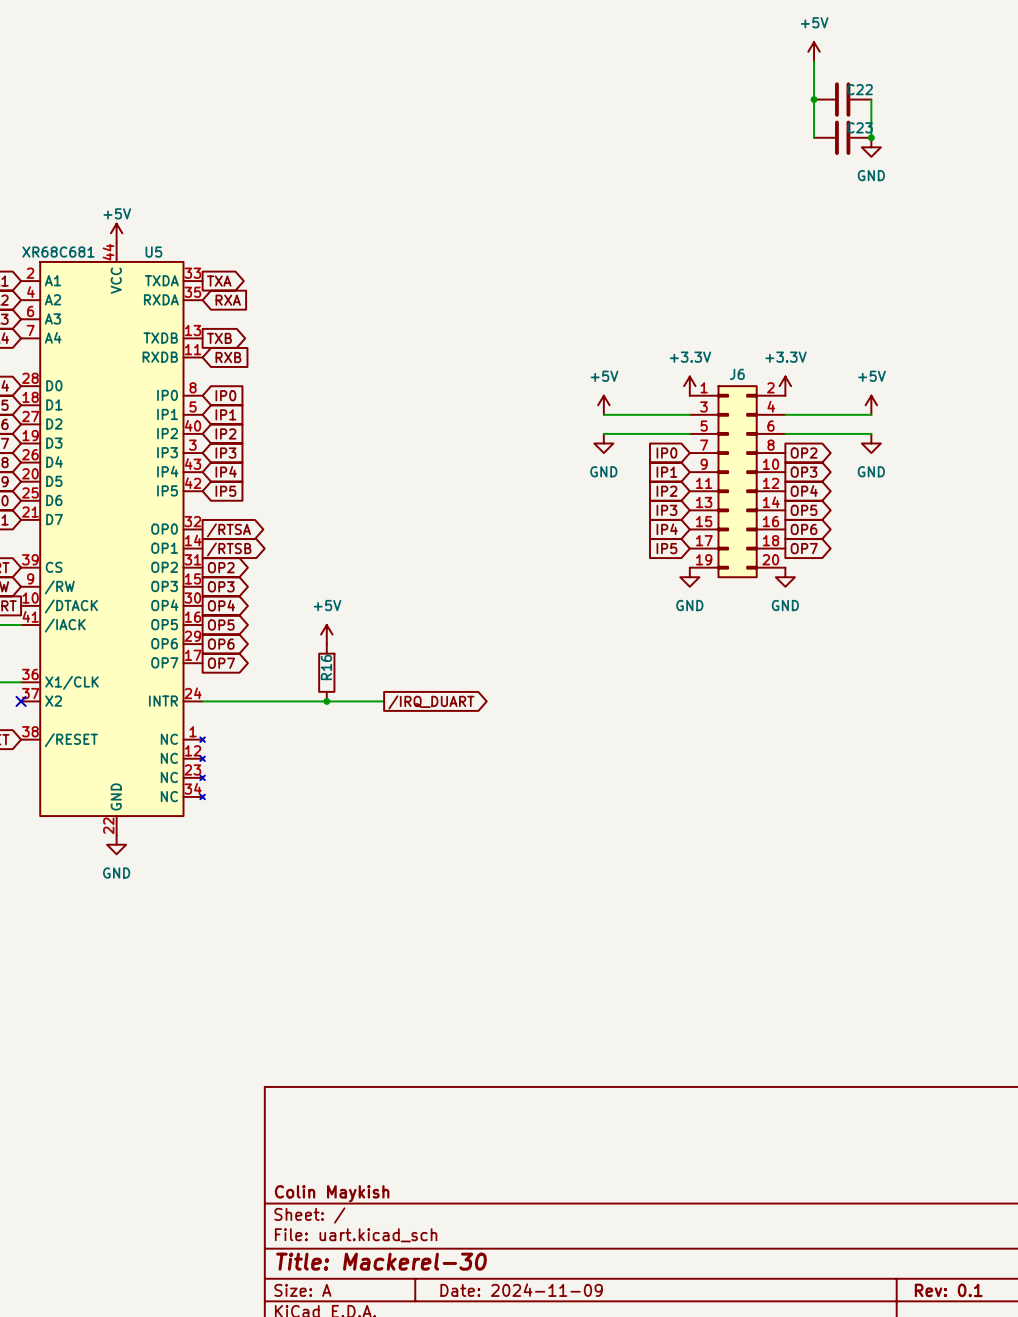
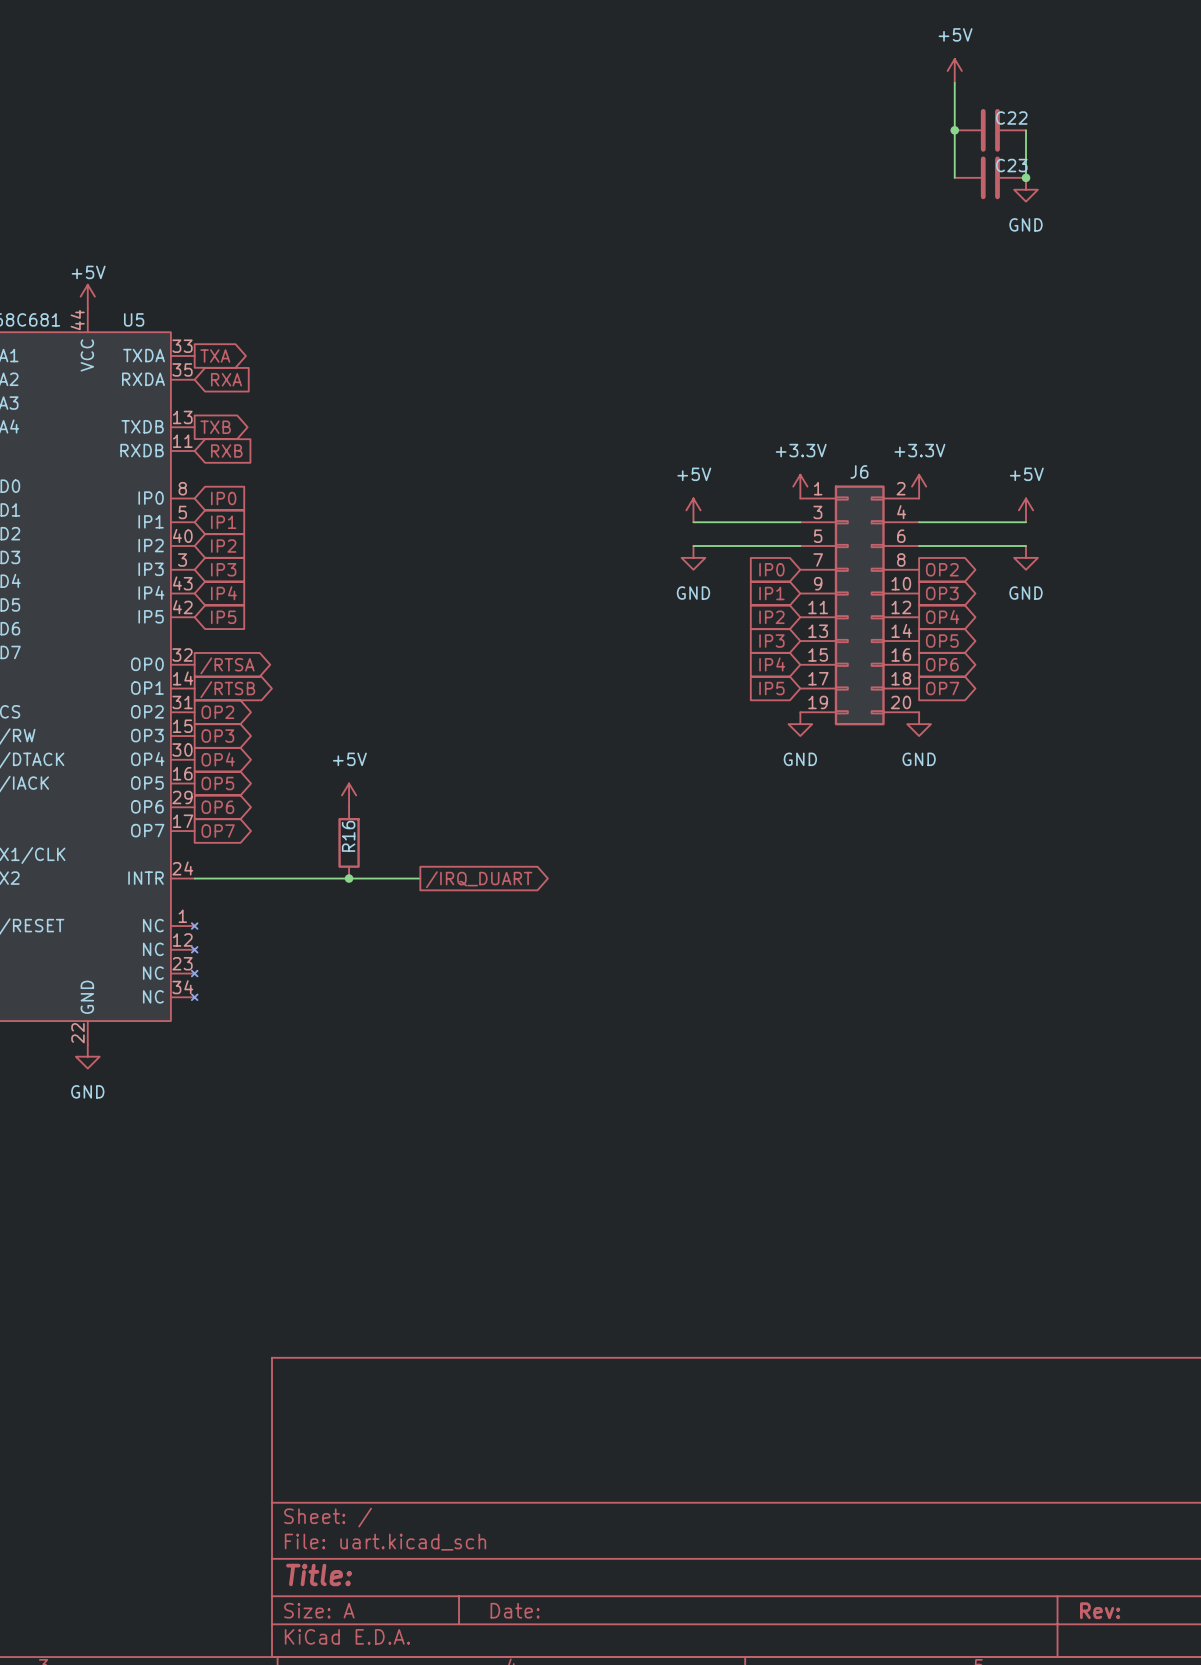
title block: Colin Maykish (332, 1193) -> none
title block: Title: Mackerel-30 (381, 1261) -> Title: (319, 1574)
title block: Date: 2024-11-09 (521, 1290) -> Date: (515, 1610)
title block: Rev: 0.1 (948, 1290) -> Rev: (1100, 1610)

